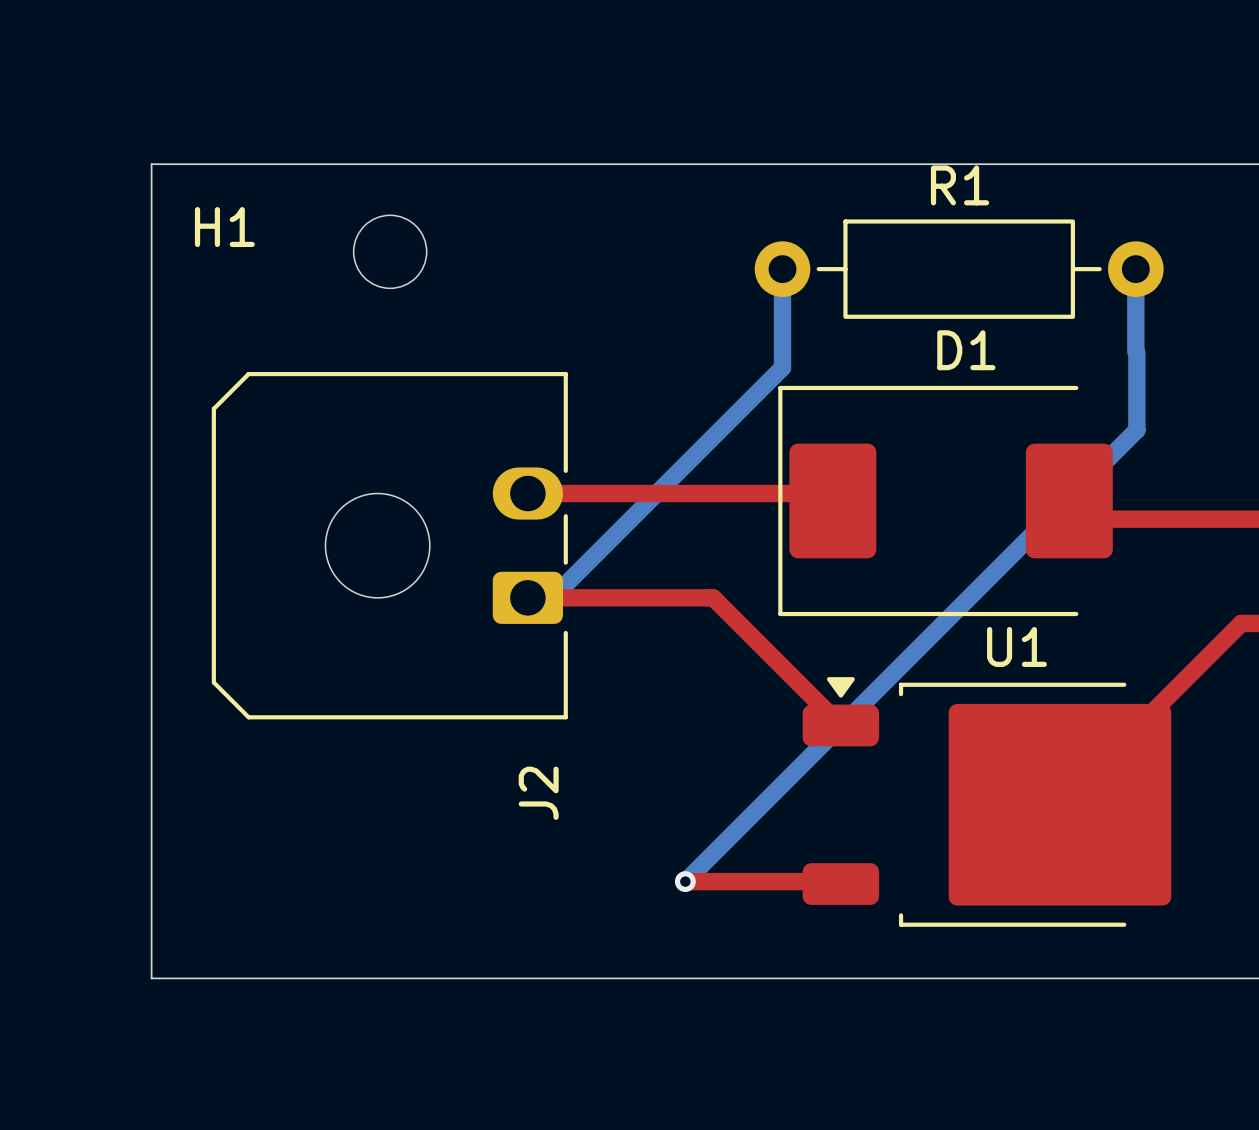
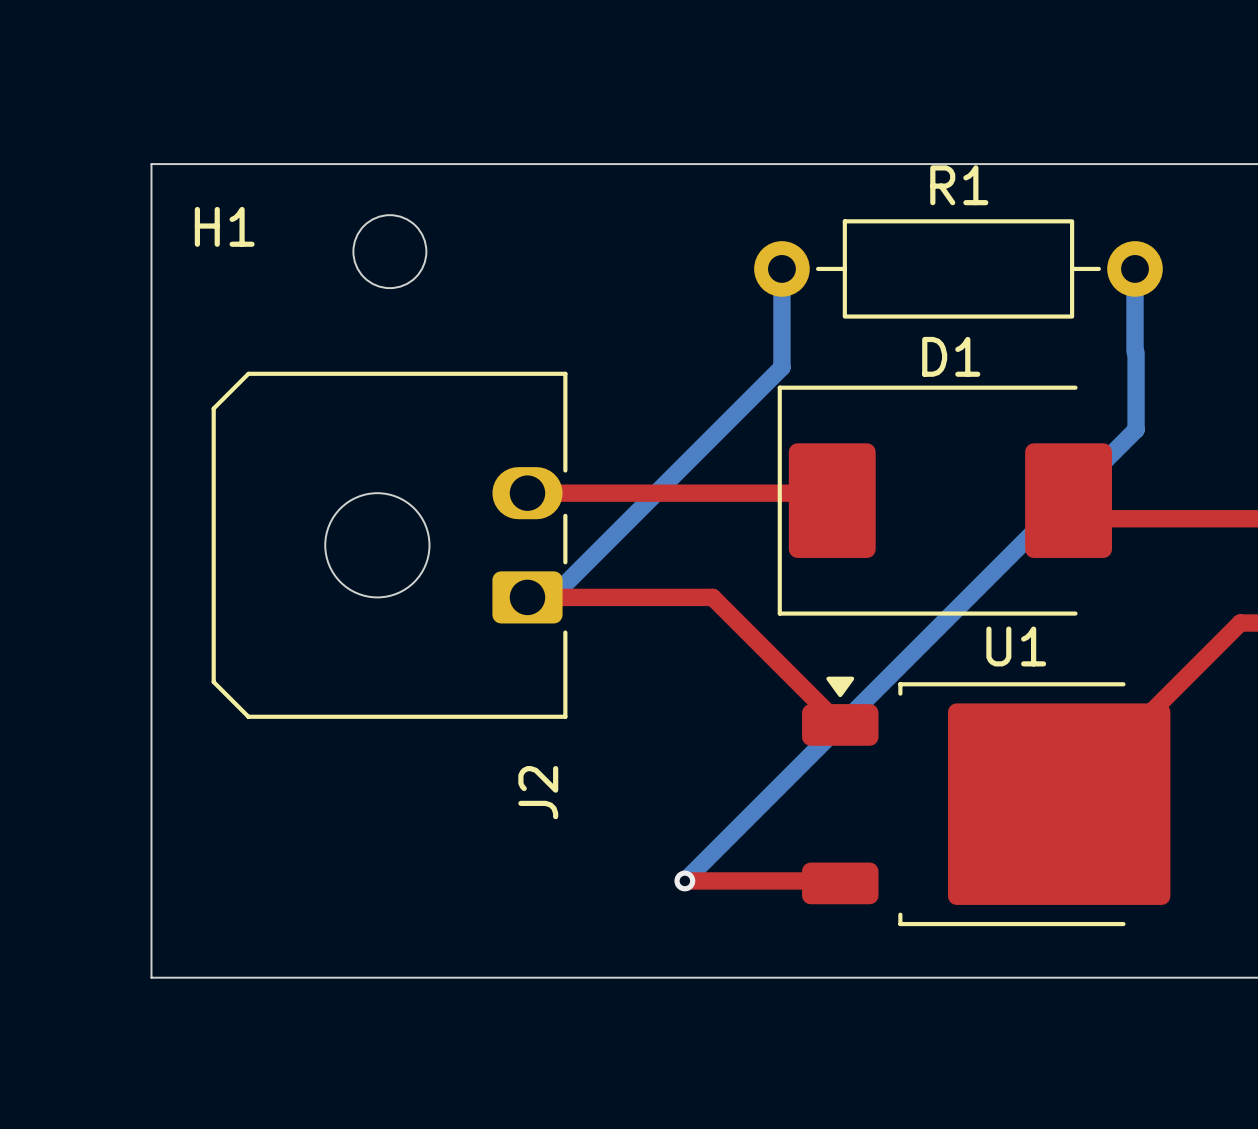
D1 name position: D1 (966, 350) -> D1 (951, 356)

